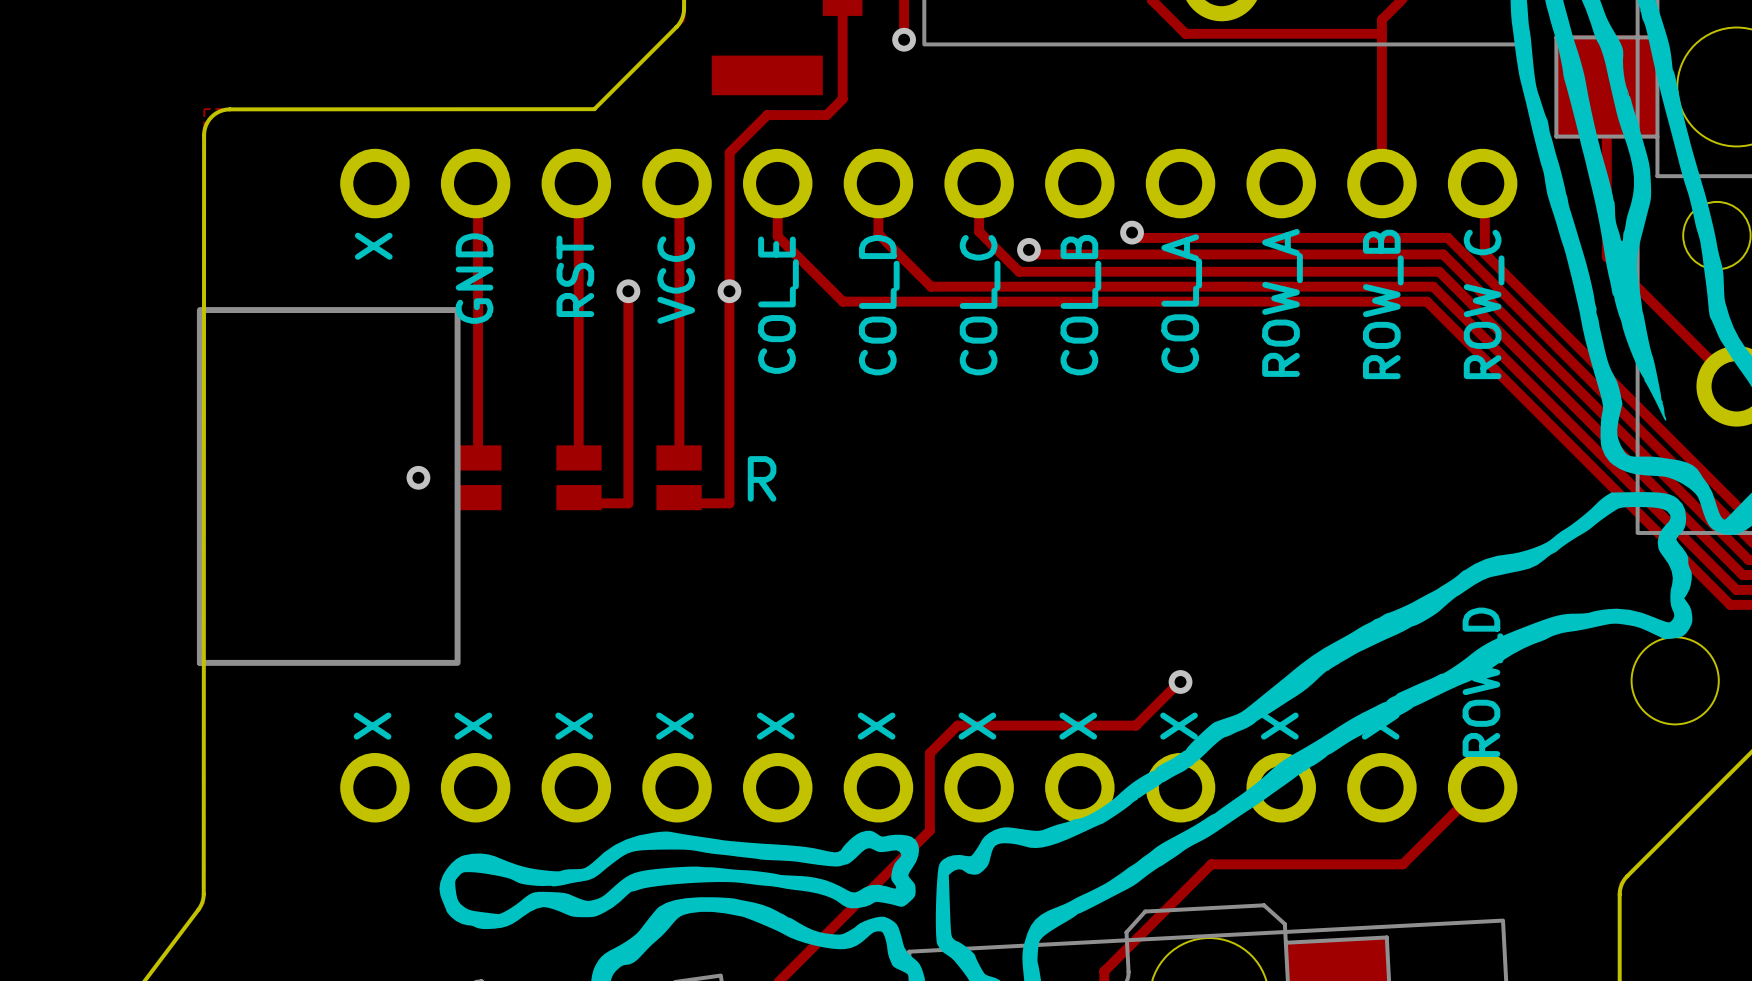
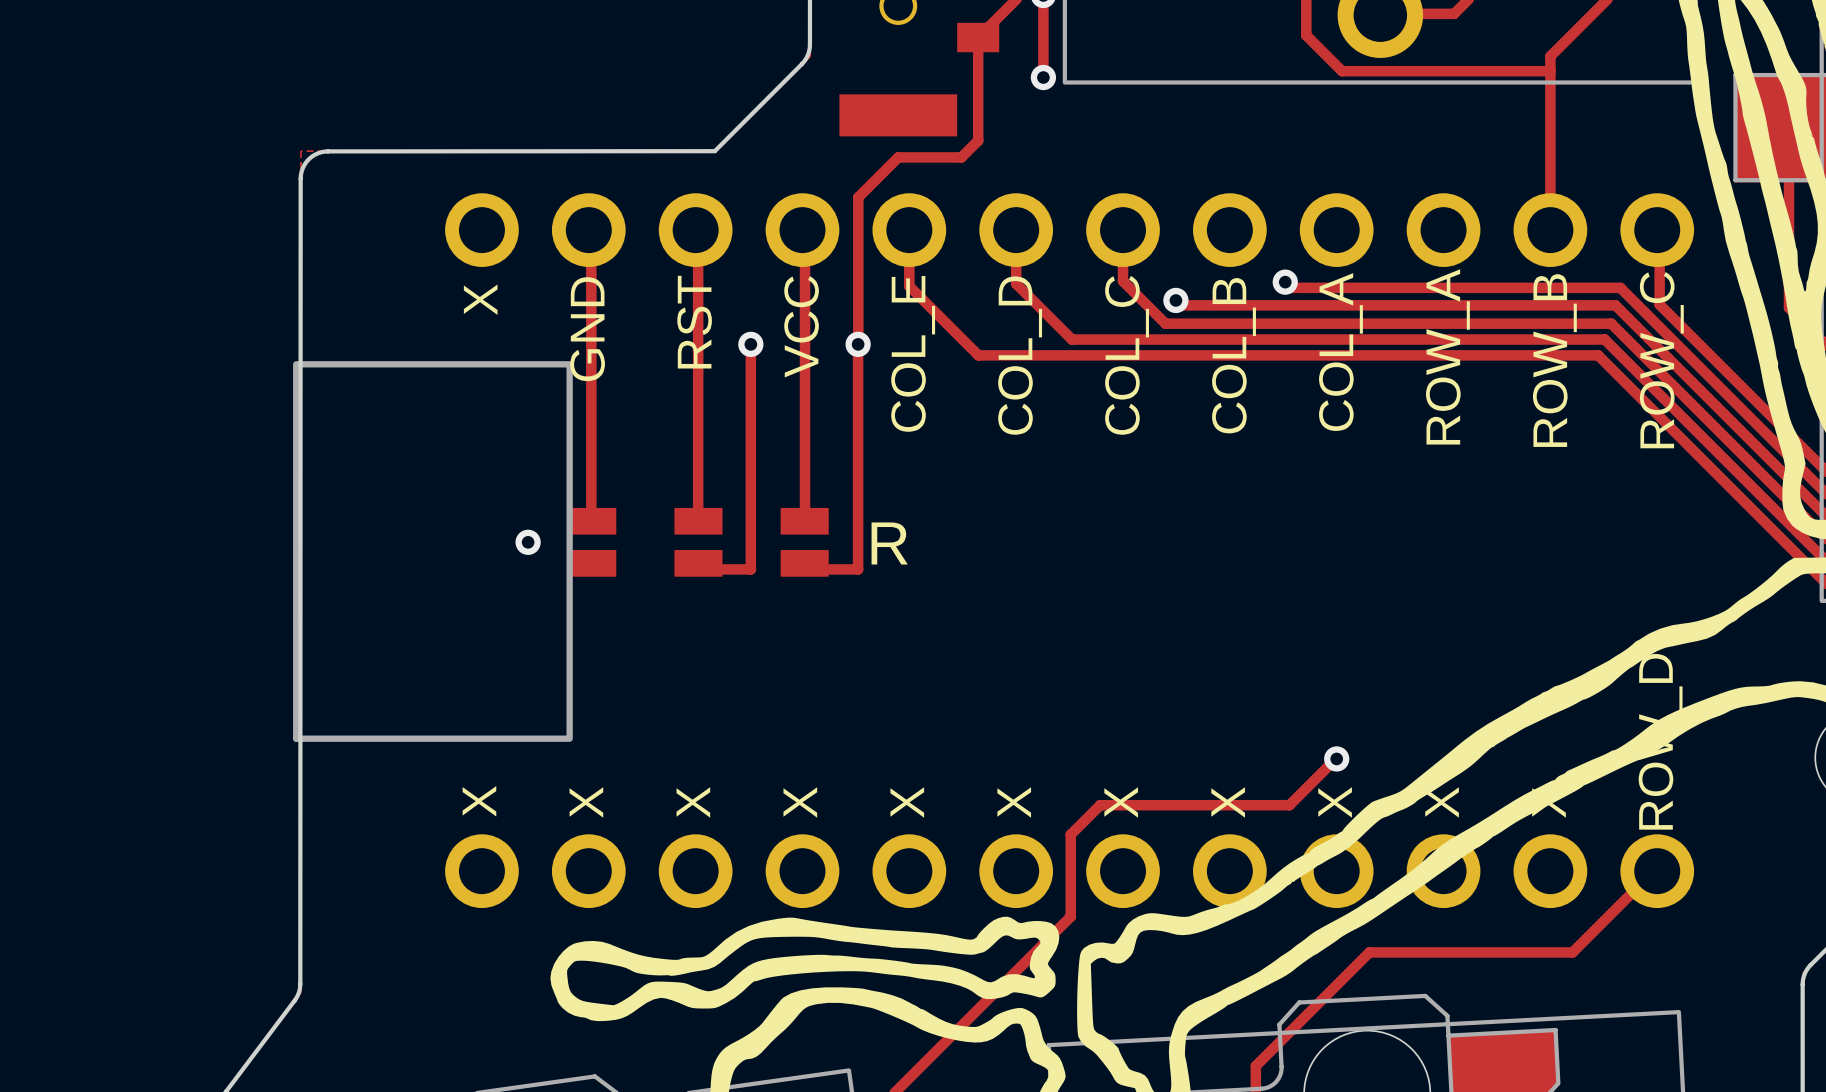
part footprint: [196, 148, 1518, 823] -> [293, 193, 1695, 909]

